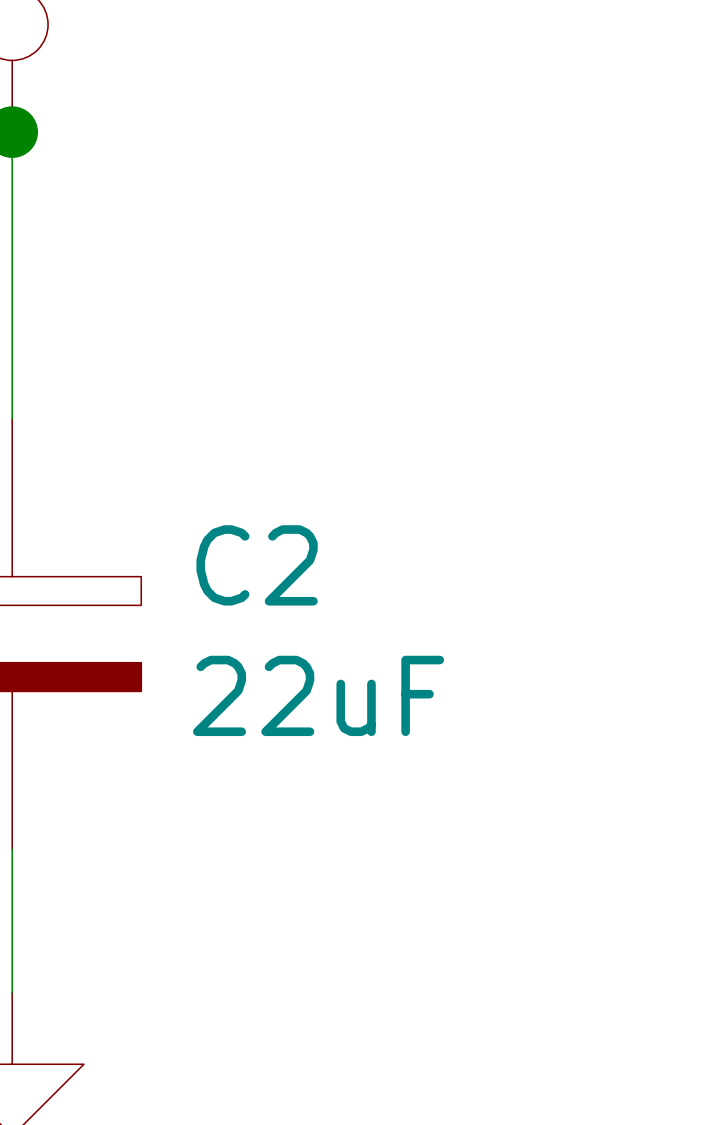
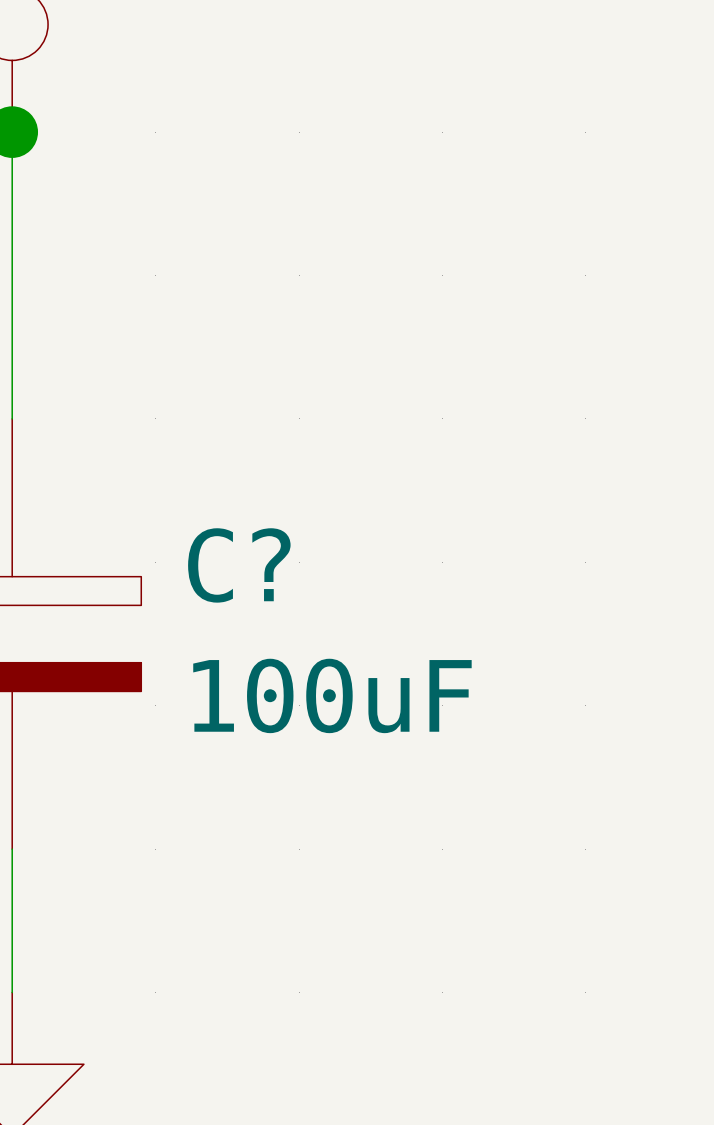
C2 name: C2 (257, 565) -> C? (239, 565)
C2 value: 22uF (318, 695) -> 100uF (332, 695)

